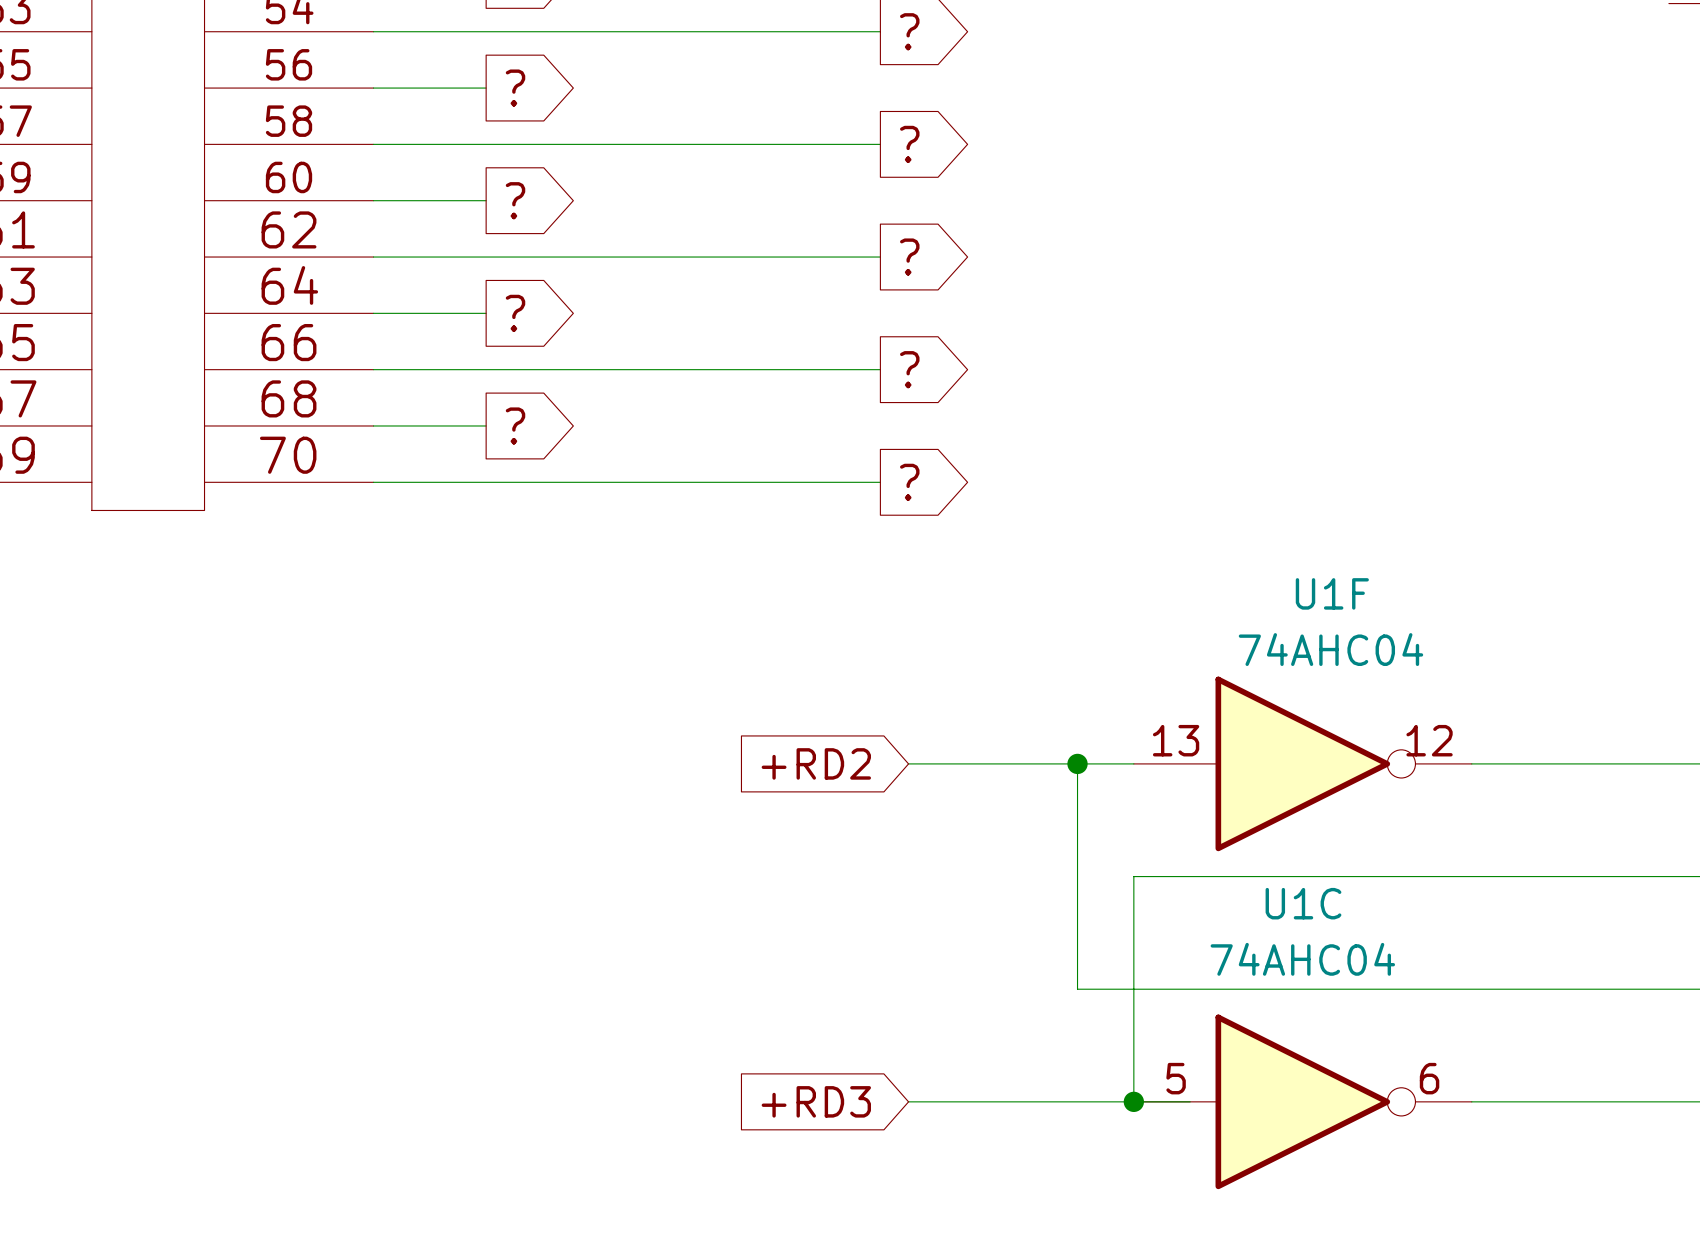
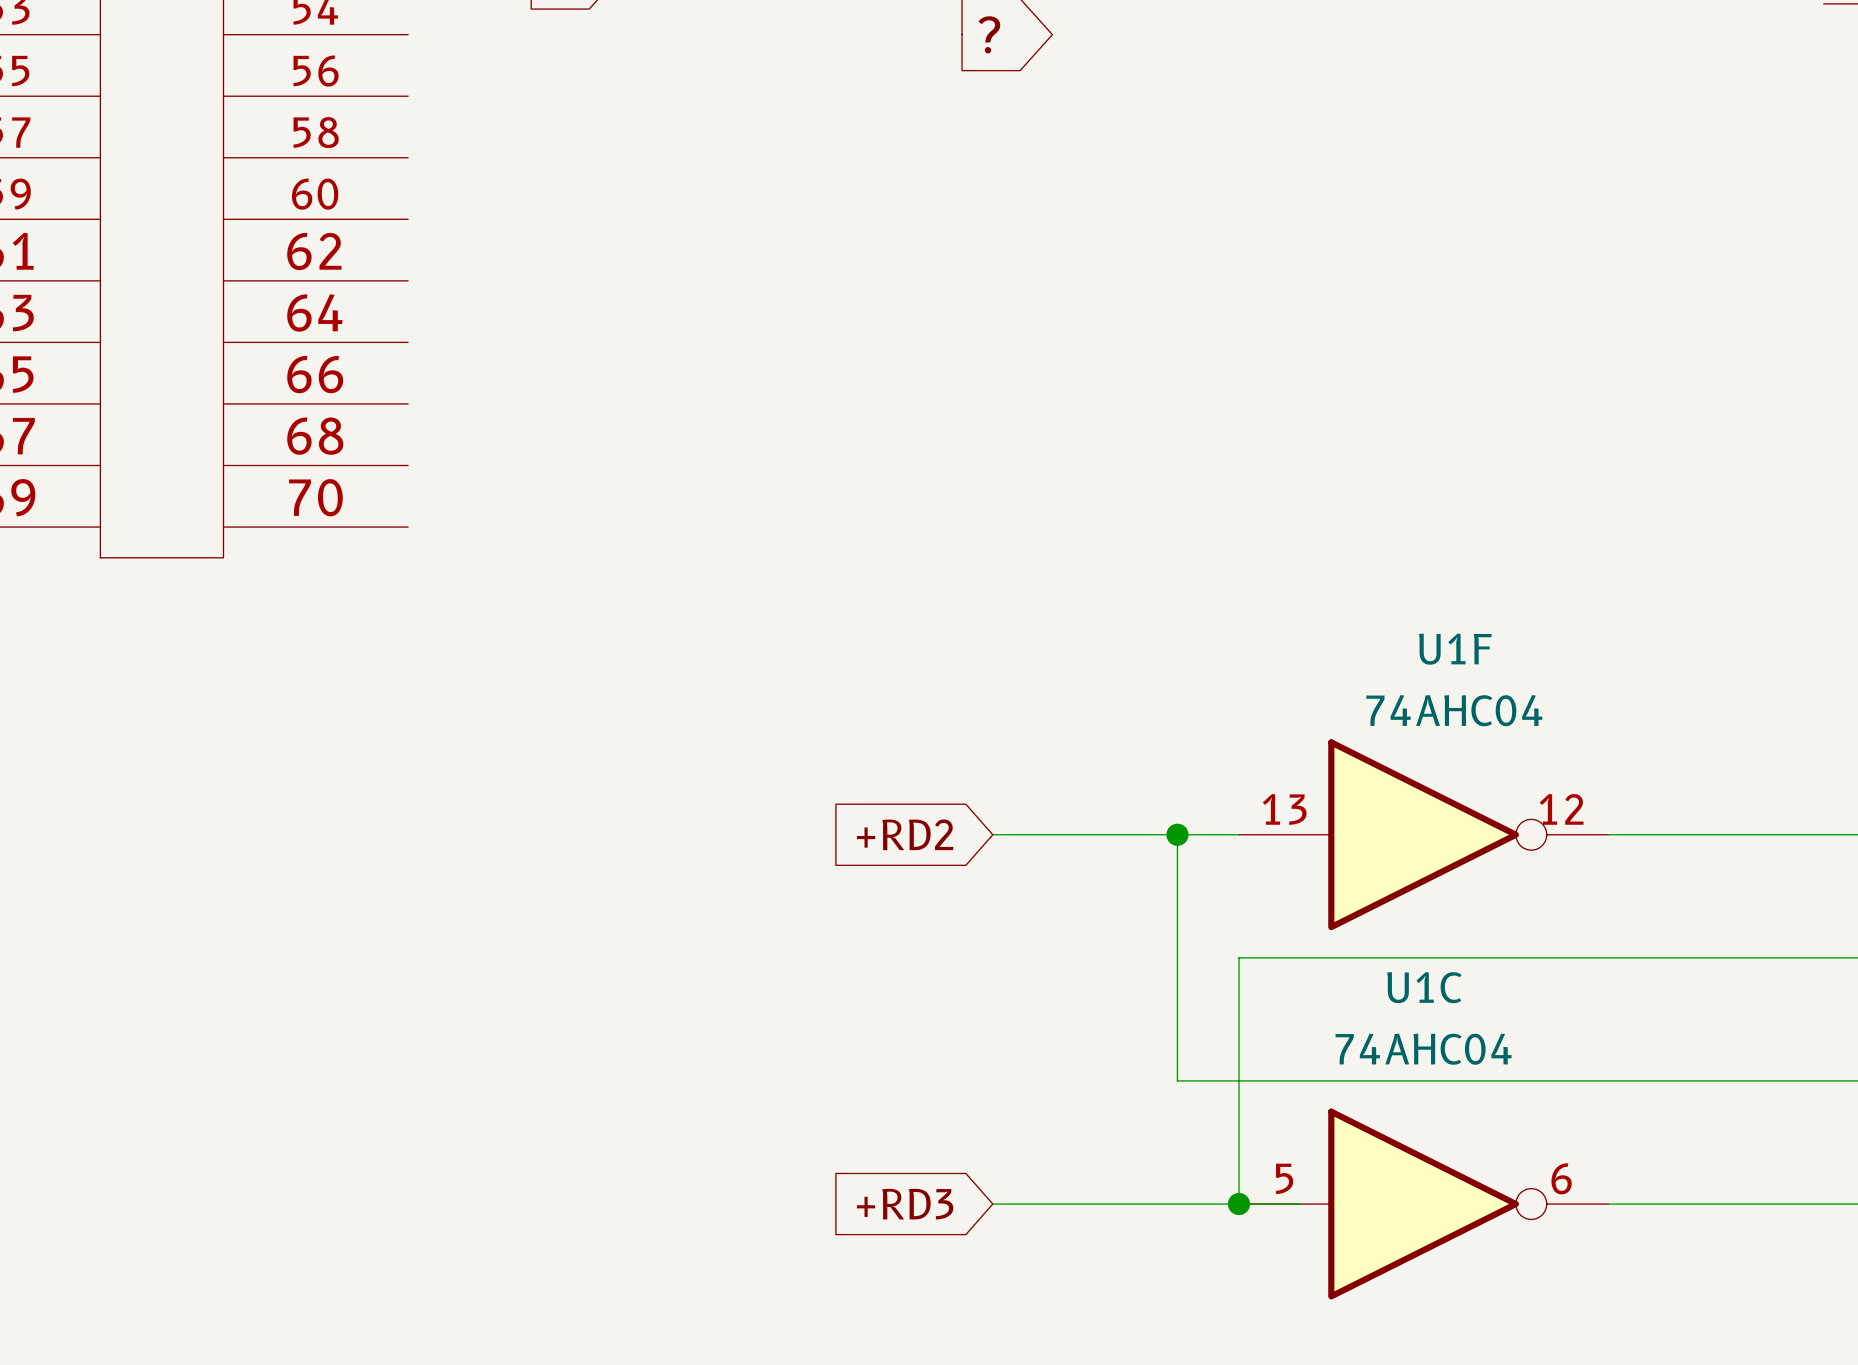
wire: (373, 31) (880, 31) -> none
wire: (373, 88) (486, 88) -> none
global label: ? (515, 88) -> none
wire: (373, 144) (880, 144) -> none
global label: ? (909, 144) -> none
wire: (373, 200) (486, 200) -> none
global label: ? (515, 200) -> none
wire: (373, 257) (880, 257) -> none
global label: ? (909, 257) -> none
wire: (373, 313) (486, 313) -> none
global label: ? (515, 313) -> none
wire: (373, 369) (880, 369) -> none
global label: ? (909, 369) -> none
wire: (373, 425) (486, 425) -> none
global label: ? (515, 425) -> none
wire: (373, 482) (880, 482) -> none
global label: ? (909, 482) -> none

